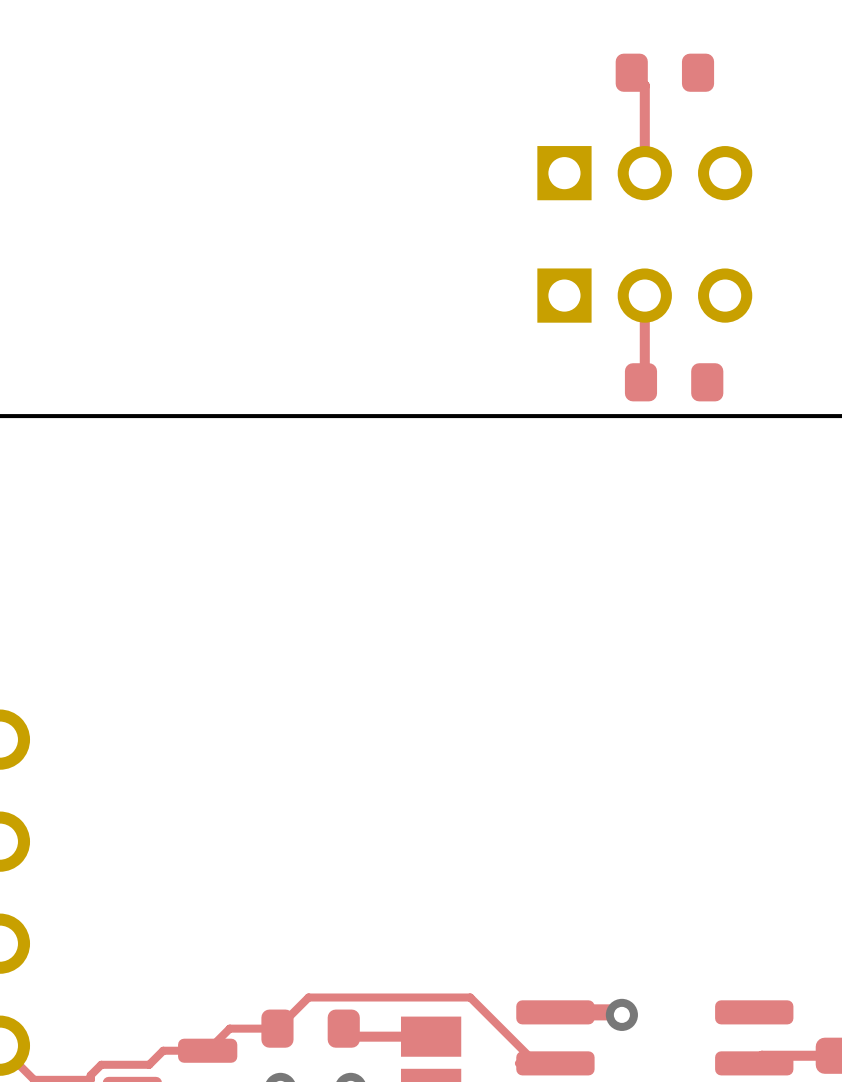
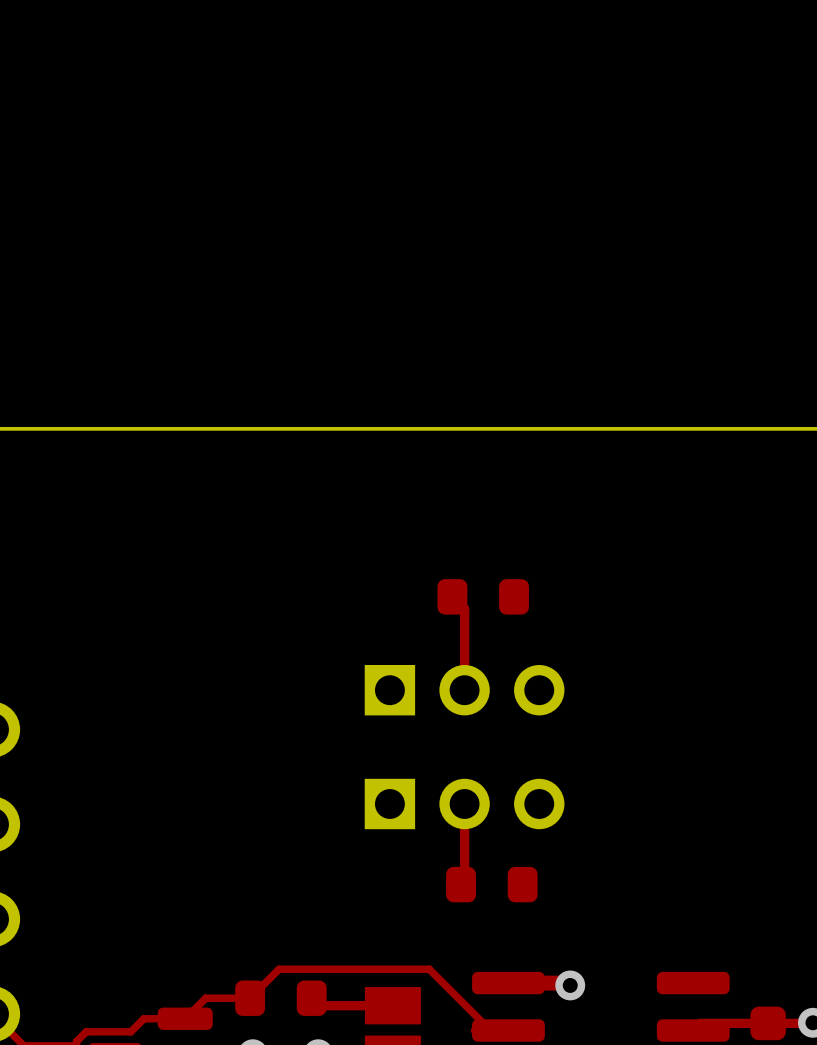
top track: (631, 72) (644, 85) (644, 173) -> (452, 596) (464, 608) (464, 690)
part: (664, 72) -> none
part: (644, 173) -> none
top track: (644, 295) (644, 378) (640, 382) -> (464, 804) (464, 881) (461, 884)
part: (644, 295) -> none
part position: (674, 382) -> (483, 596)
part: none -> (464, 690)
part: none -> (464, 804)
part: none -> (491, 884)

